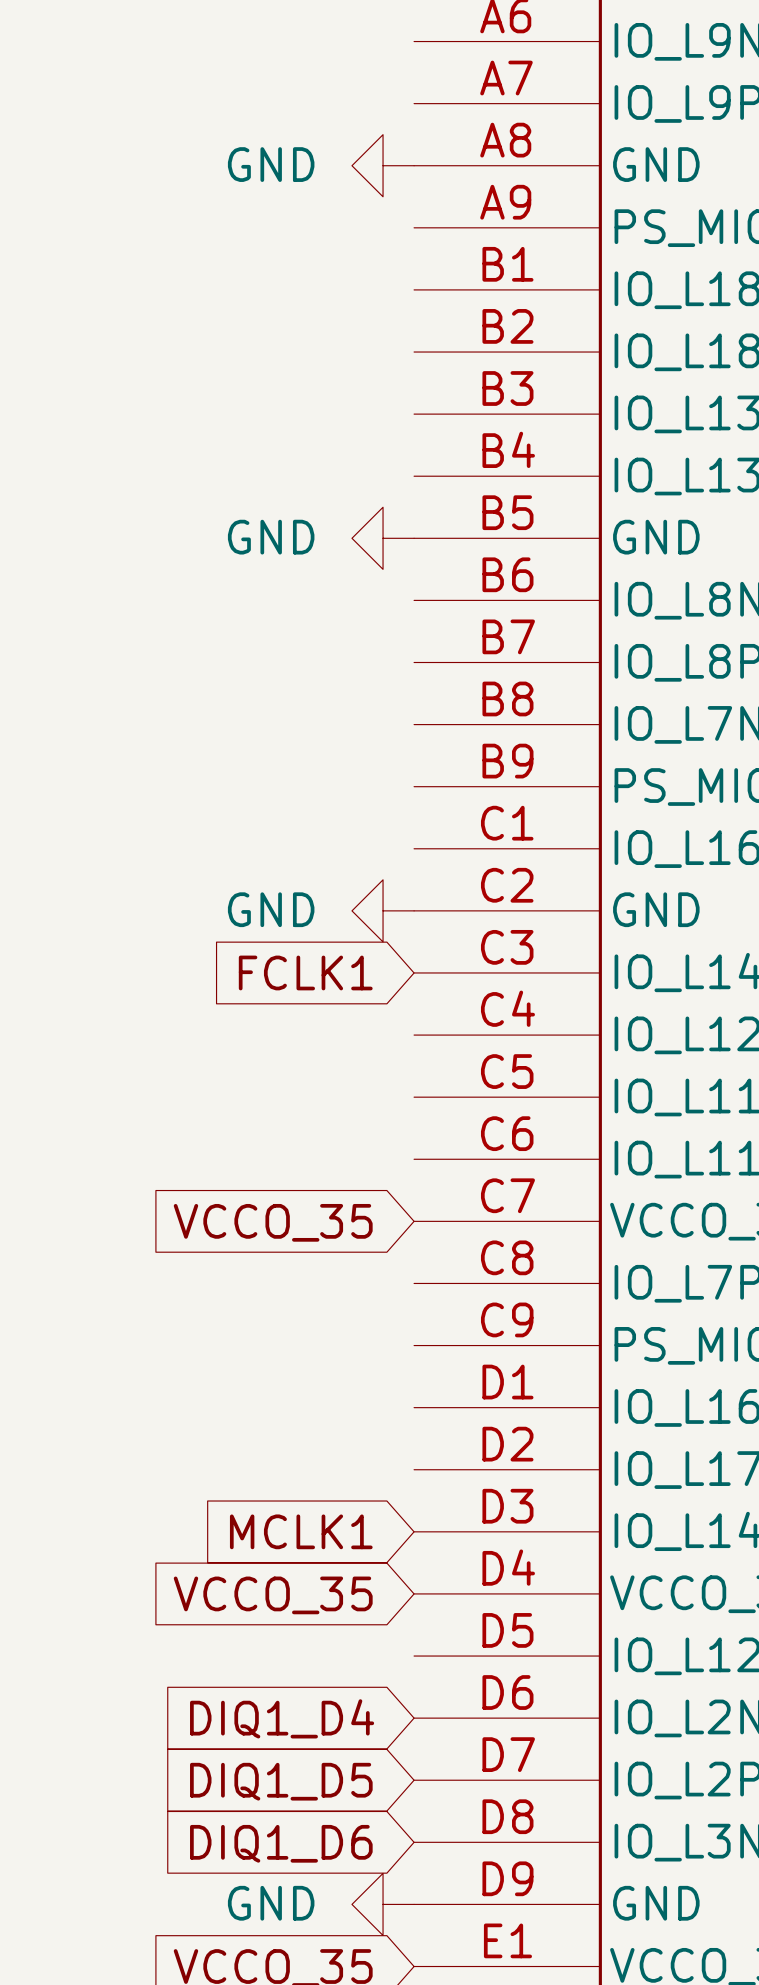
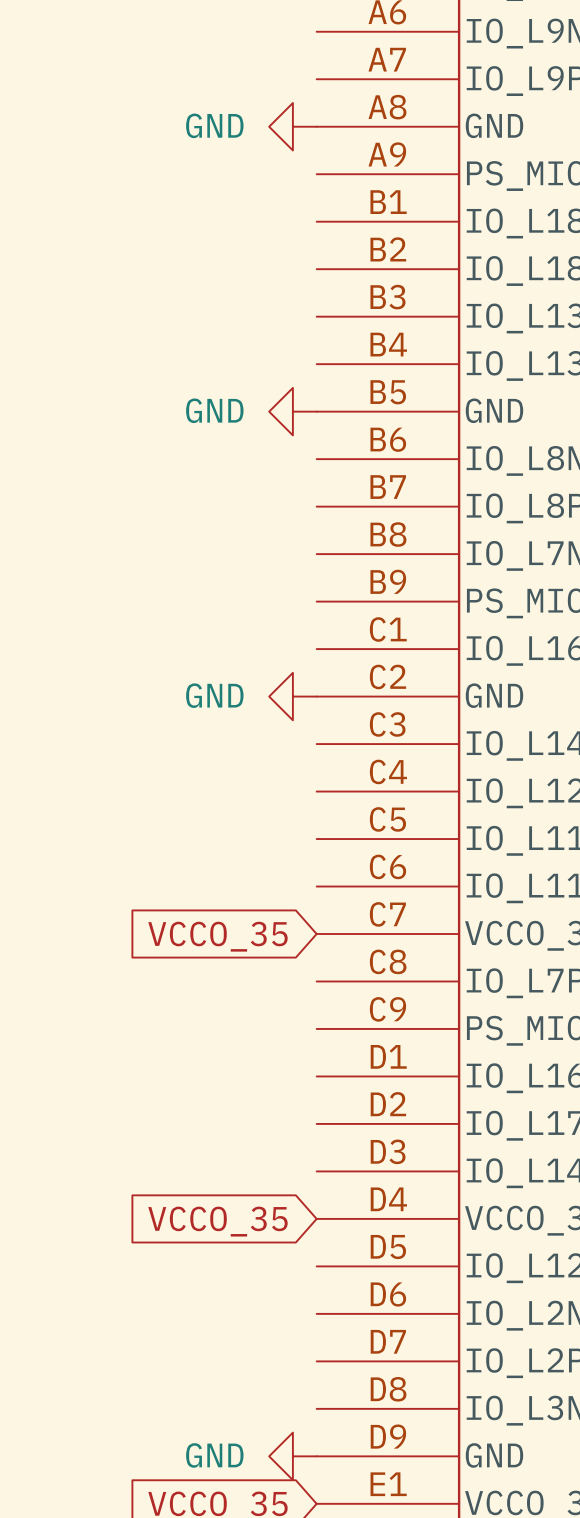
global label: FCLK1 (305, 972) -> none
global label: MCLK1 (301, 1531) -> none
global label: DIQ1_D4 (282, 1718) -> none
global label: DIQ1_D5 (281, 1781) -> none
global label: DIQ1_D6 (281, 1843) -> none

